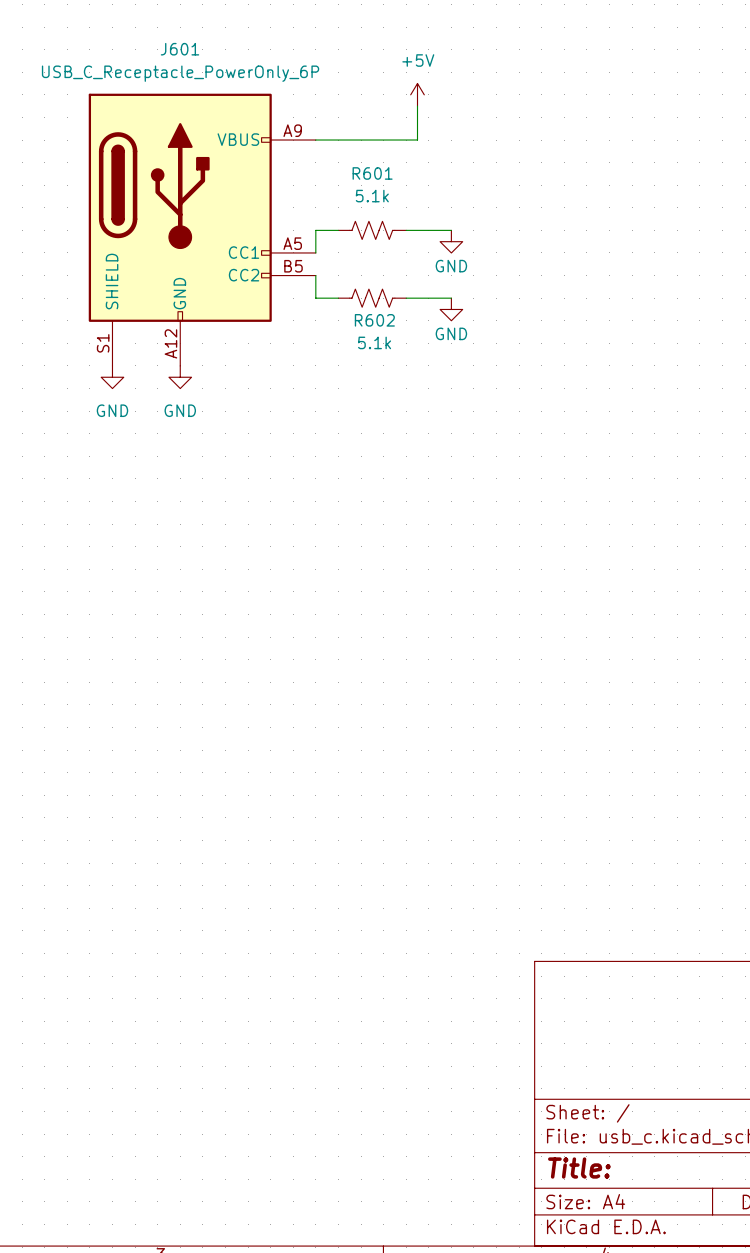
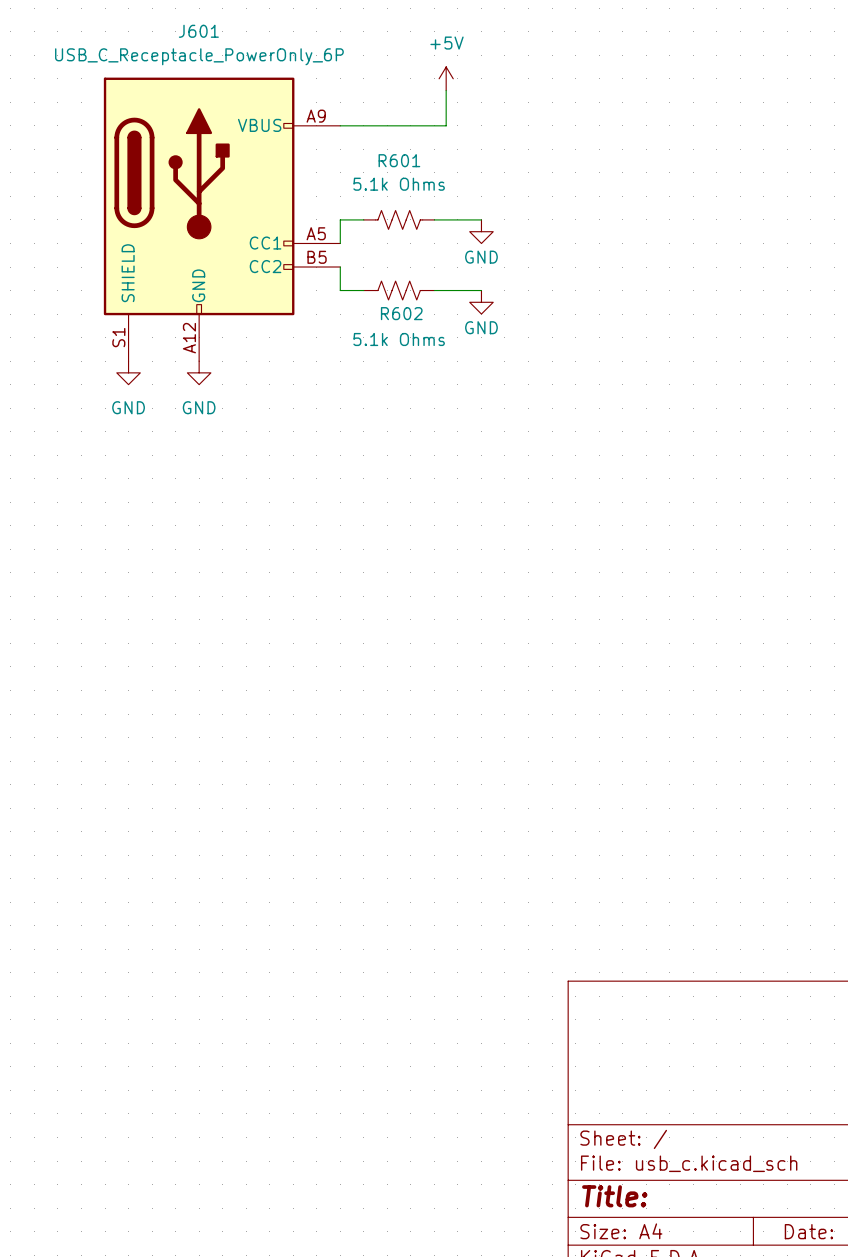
R601 value: 5.1k (372, 196) -> 5.1k Ohms (399, 184)
R602 value: 5.1k (374, 342) -> 5.1k Ohms (399, 339)

